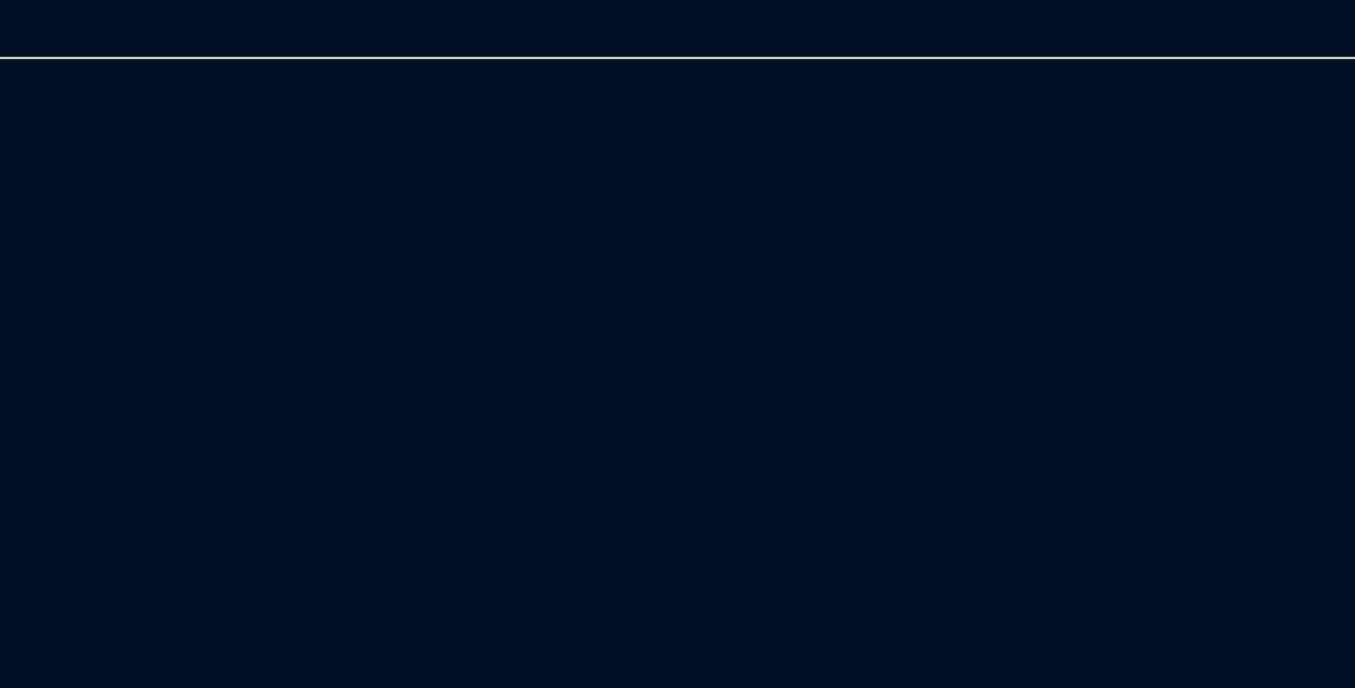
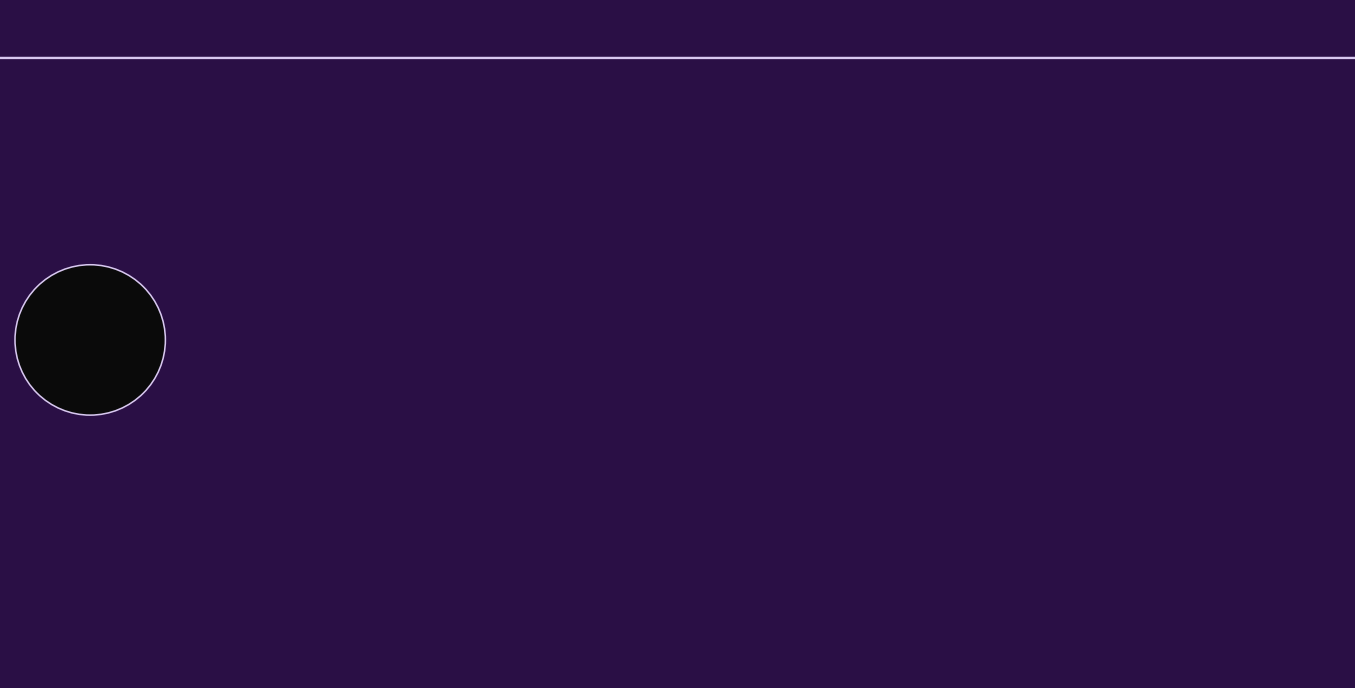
part: none -> (90, 339)

